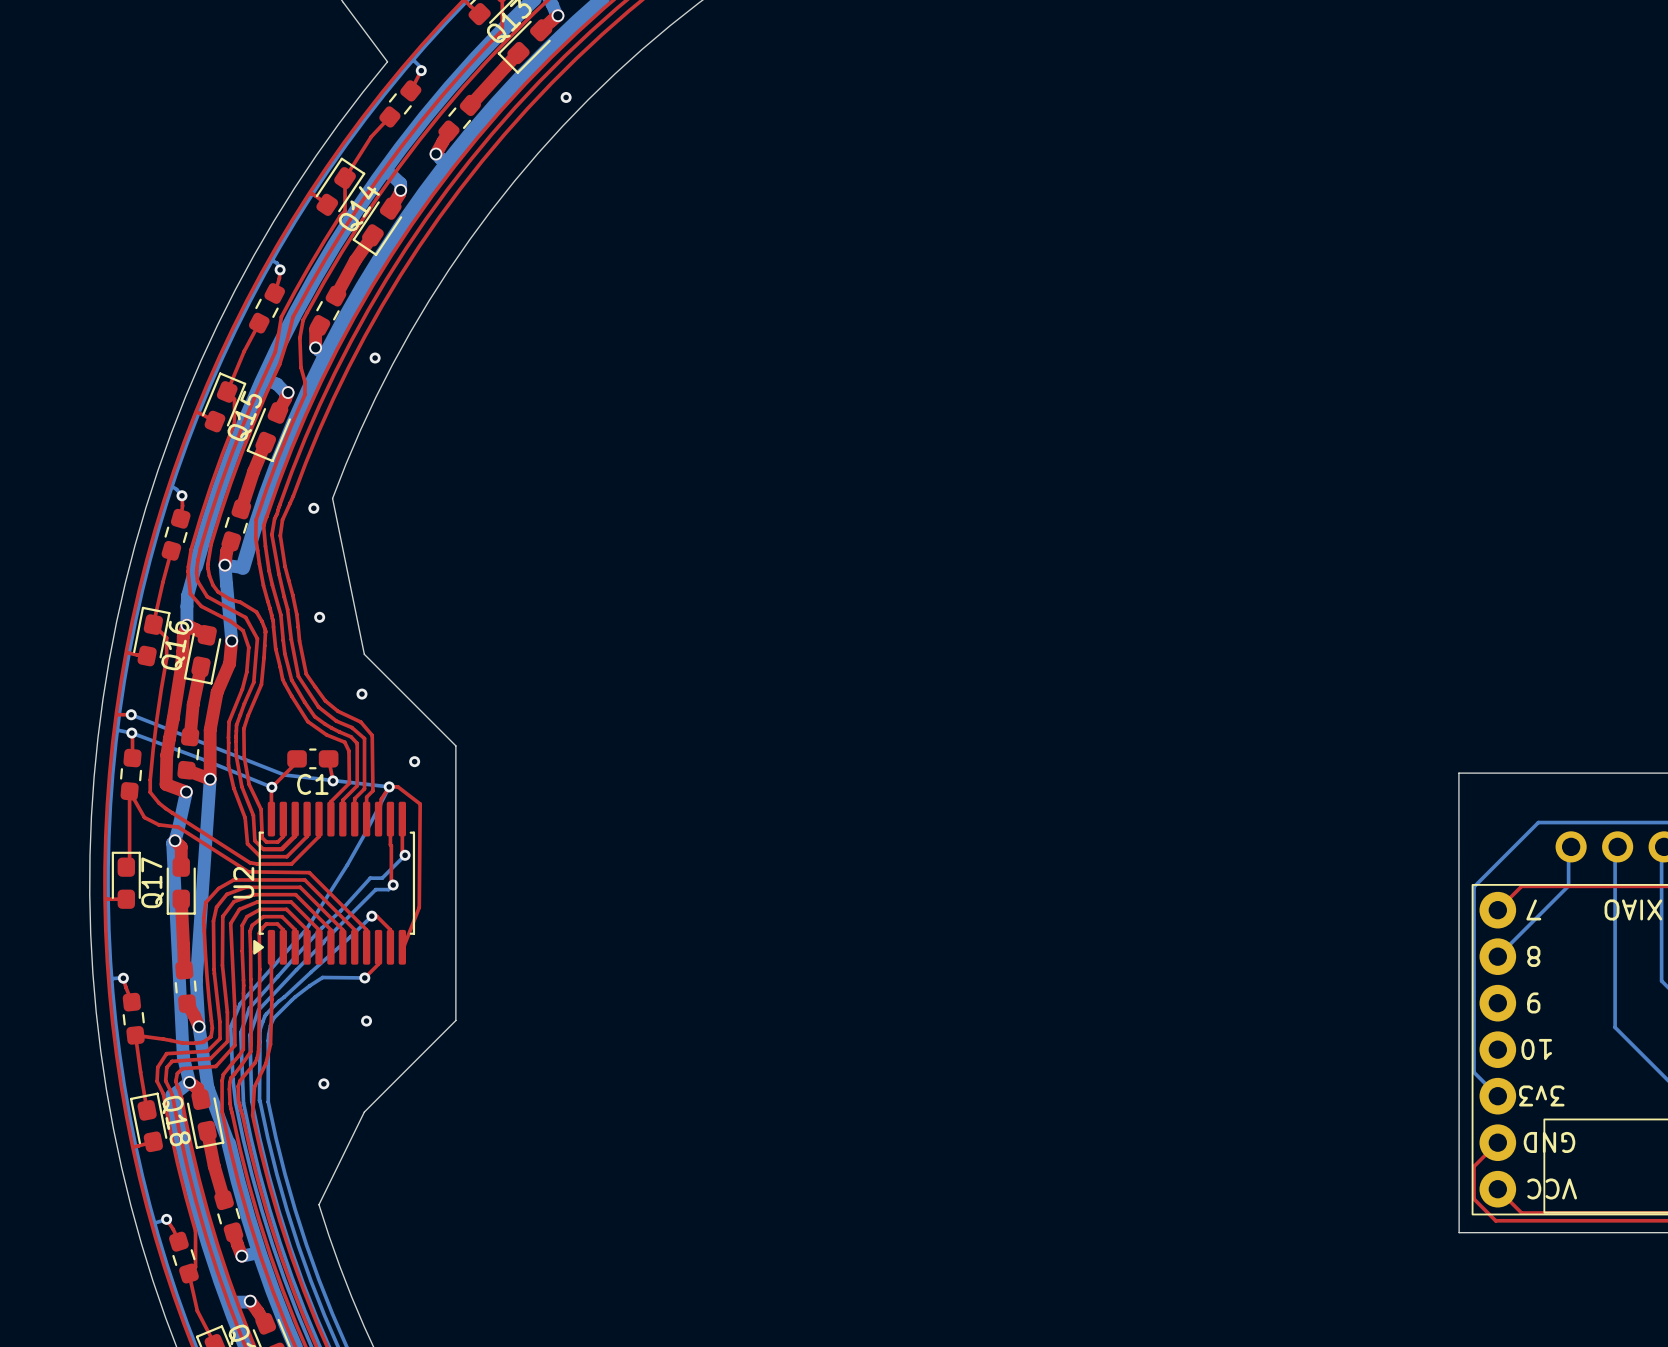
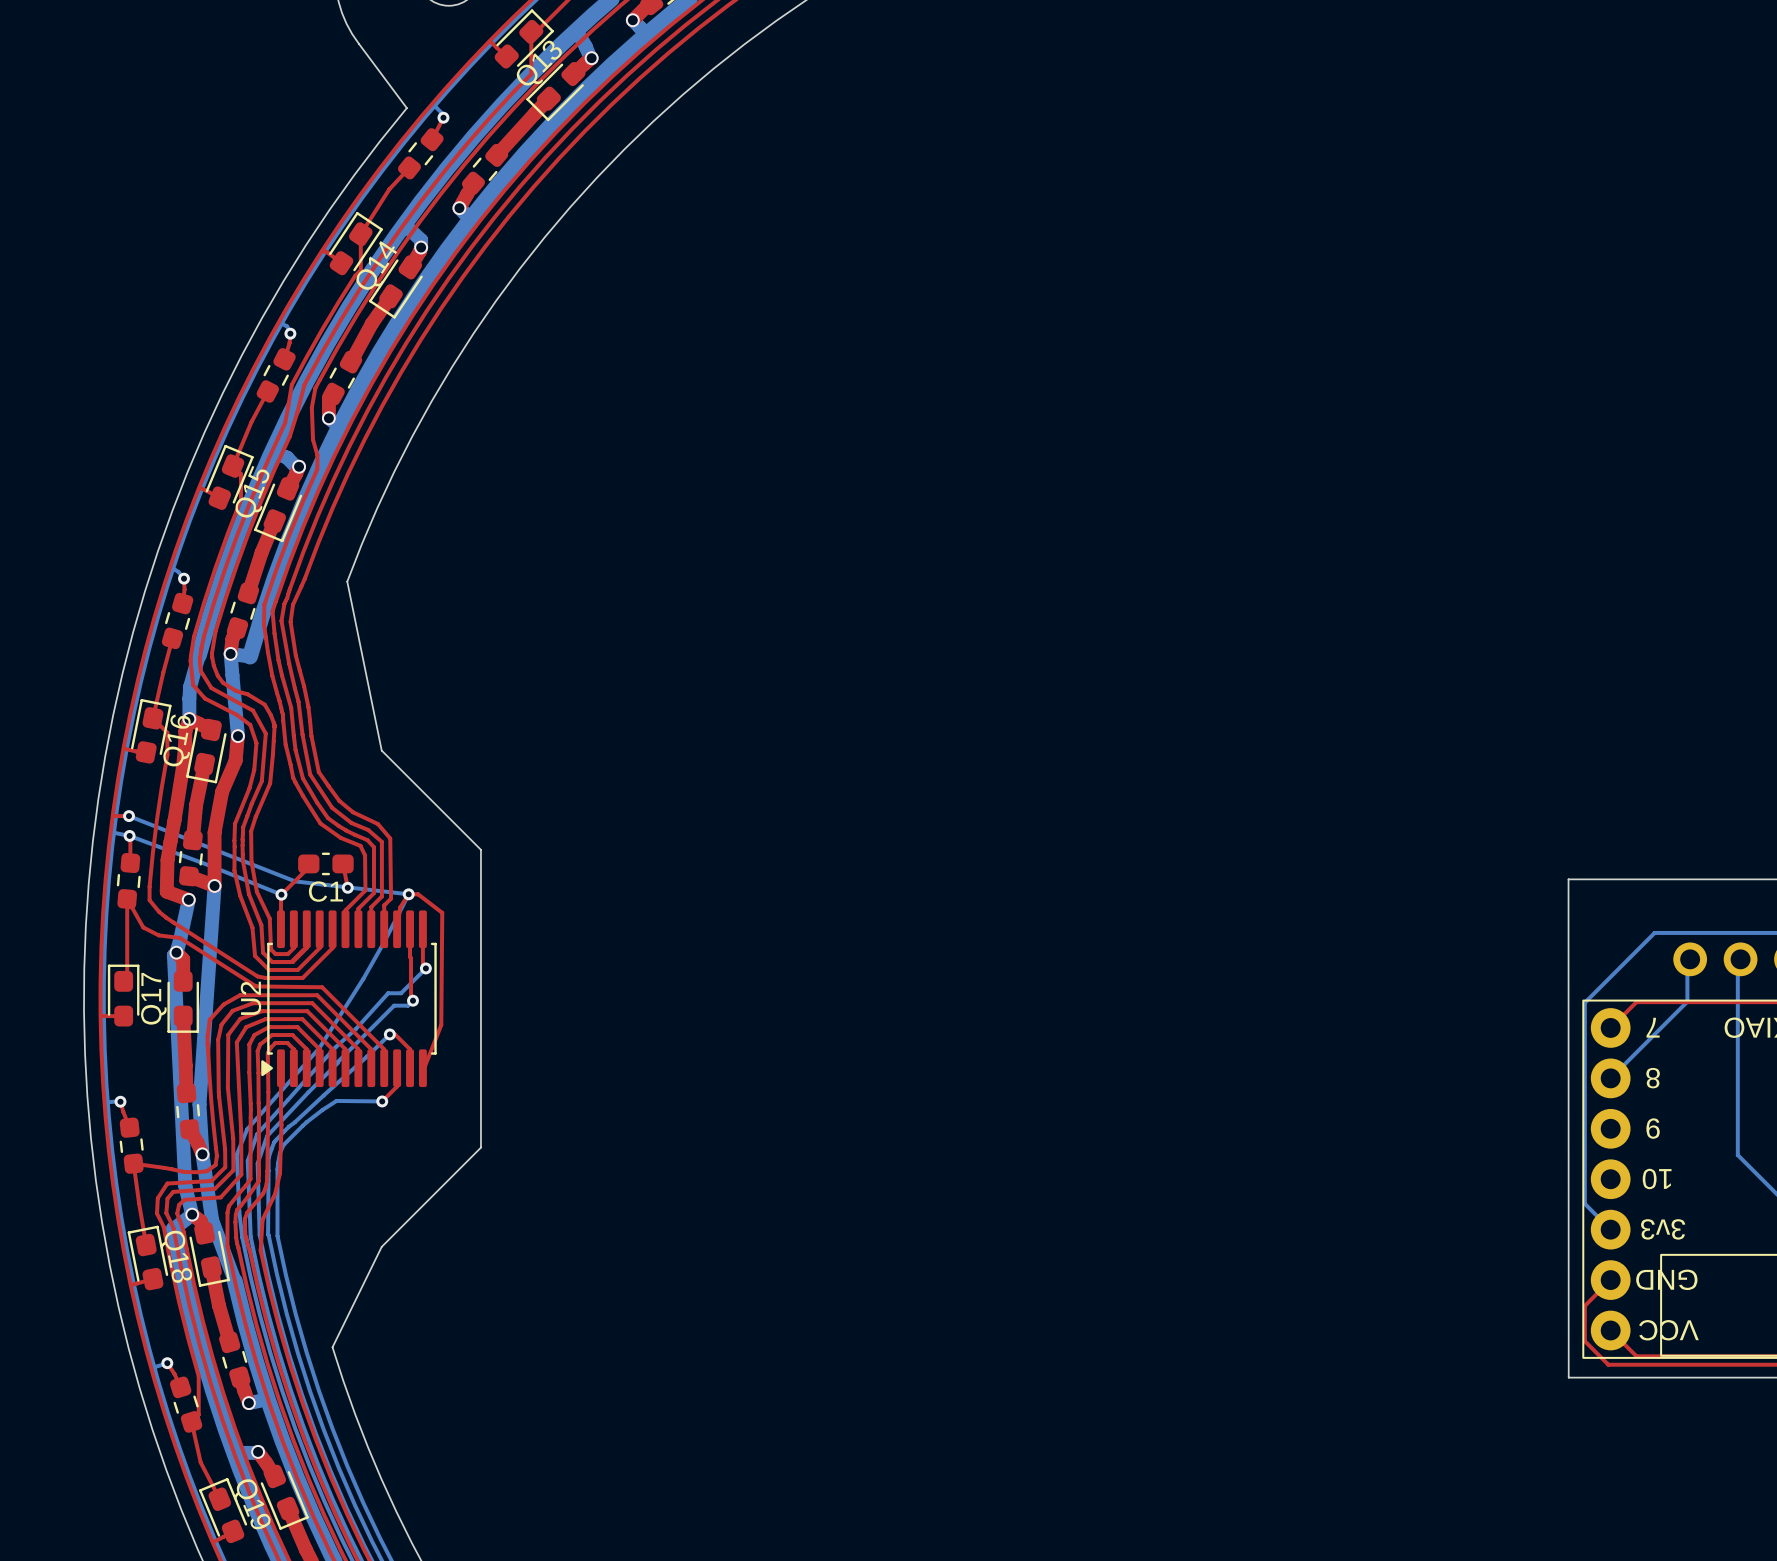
via: (566, 97) -> none
via: (375, 358) -> none
via: (313, 508) -> none
via: (319, 617) -> none
via: (361, 694) -> none
via: (414, 761) -> none
via: (366, 1021) -> none
via: (323, 1083) -> none

